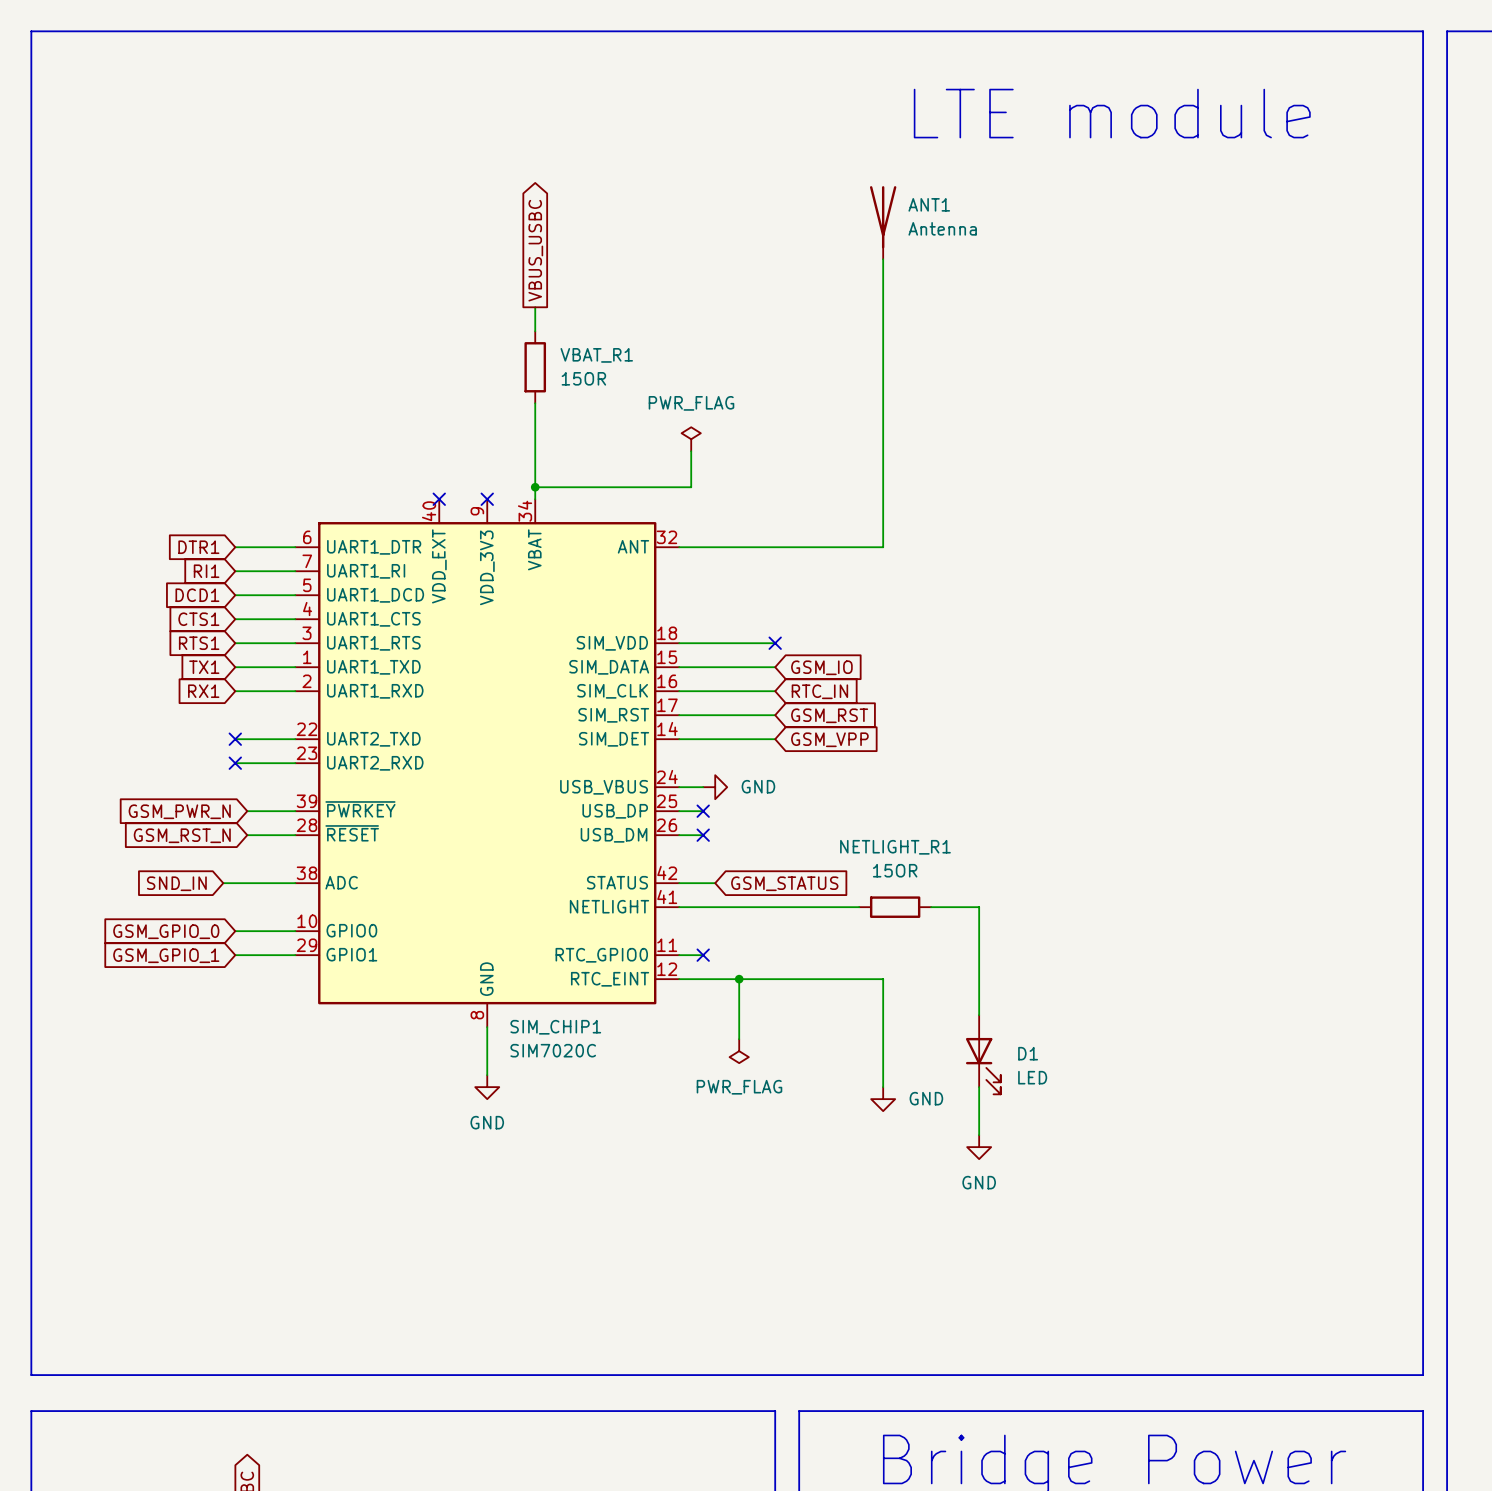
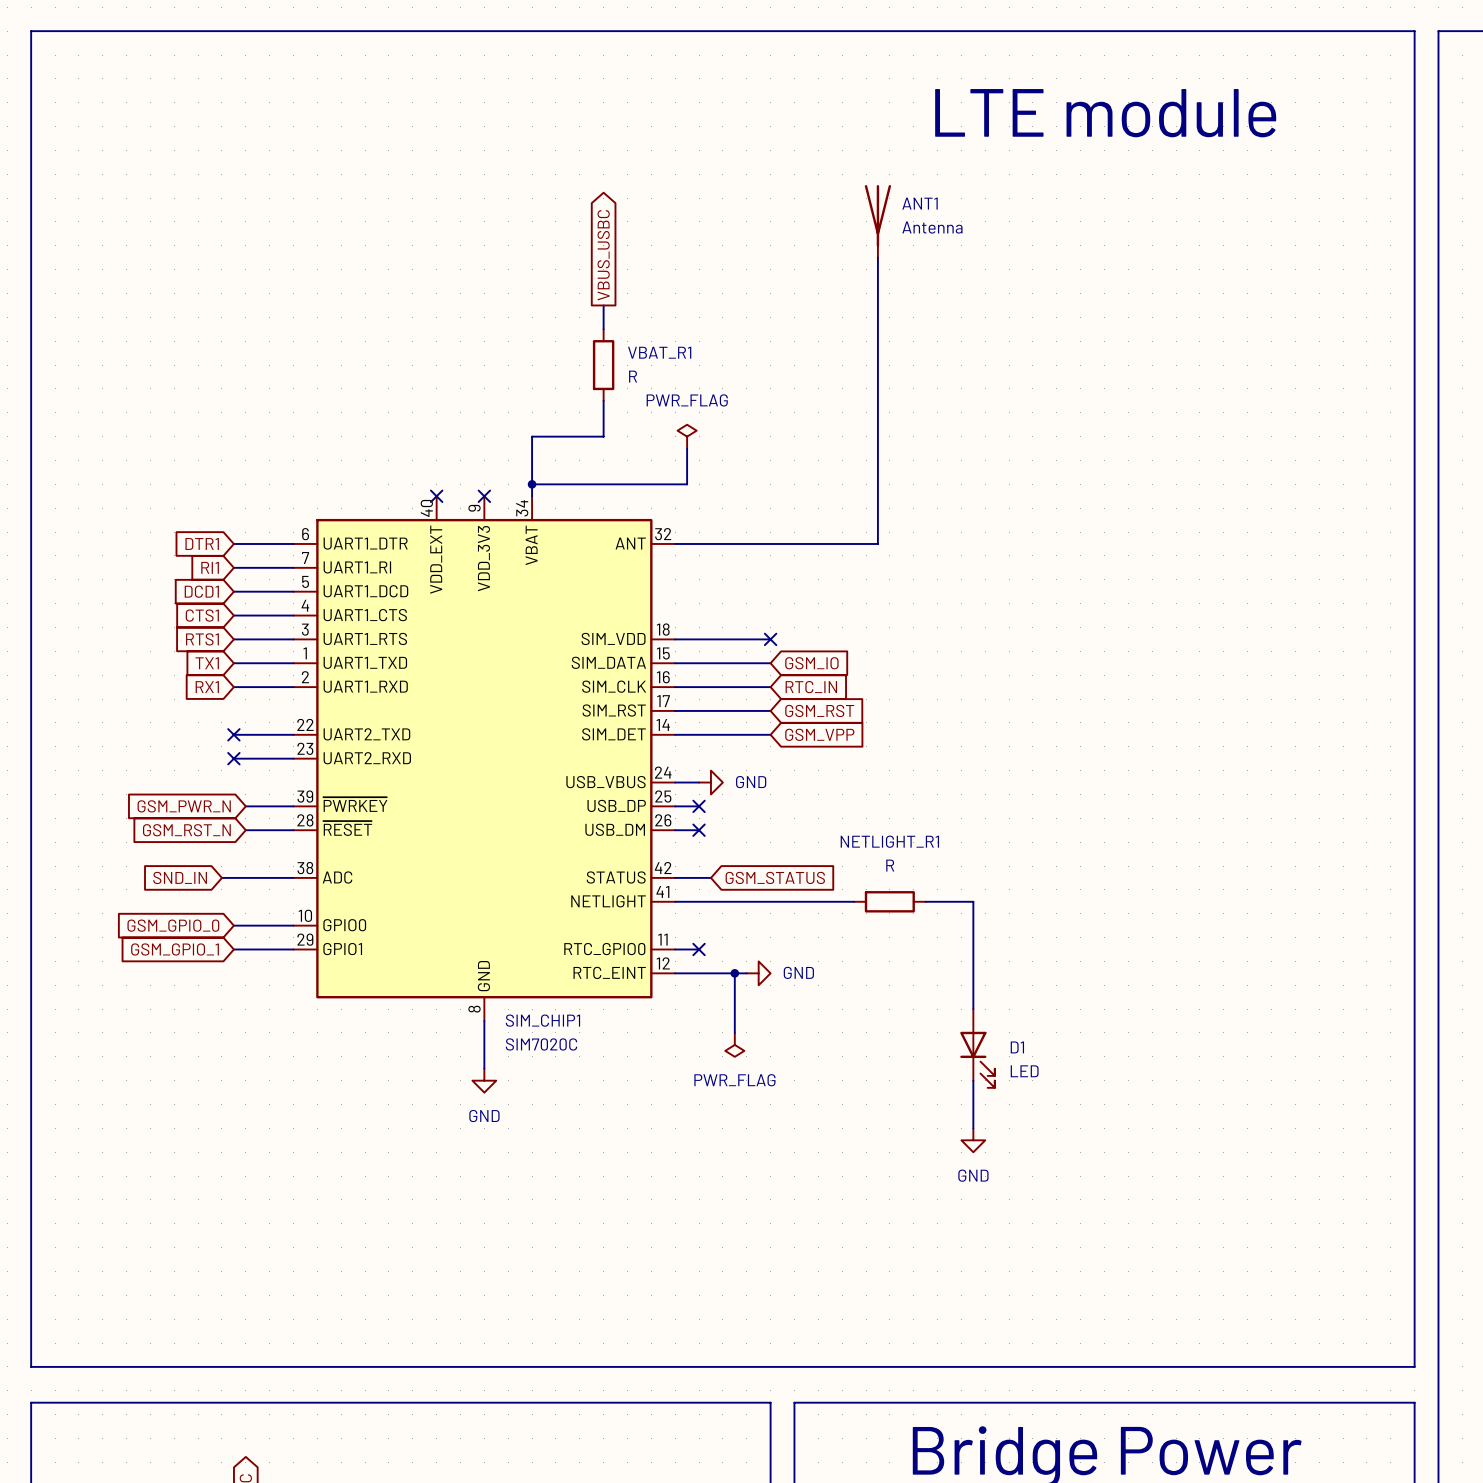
global label position: VBUS_USBC (535, 250) -> VBUS_USBC (603, 255)
wire: (535, 307) (535, 331) -> (603, 305) (603, 329)
VBAT_R1 position: (535, 367) -> (603, 365)
VBAT_R1 value: 15OR (583, 378) -> R (633, 376)
wire: (535, 403) (535, 439) -> (603, 400) (603, 436) (532, 436)
NETLIGHT_R1 value: 15OR (895, 870) -> R (890, 865)
wire: (751, 979) (883, 979) (883, 1087) -> none
power symbol rotation: 0° (883, 1099) -> 90° counterclockwise (758, 973)
power symbol position: GND (883, 1099) -> GND (758, 973)

